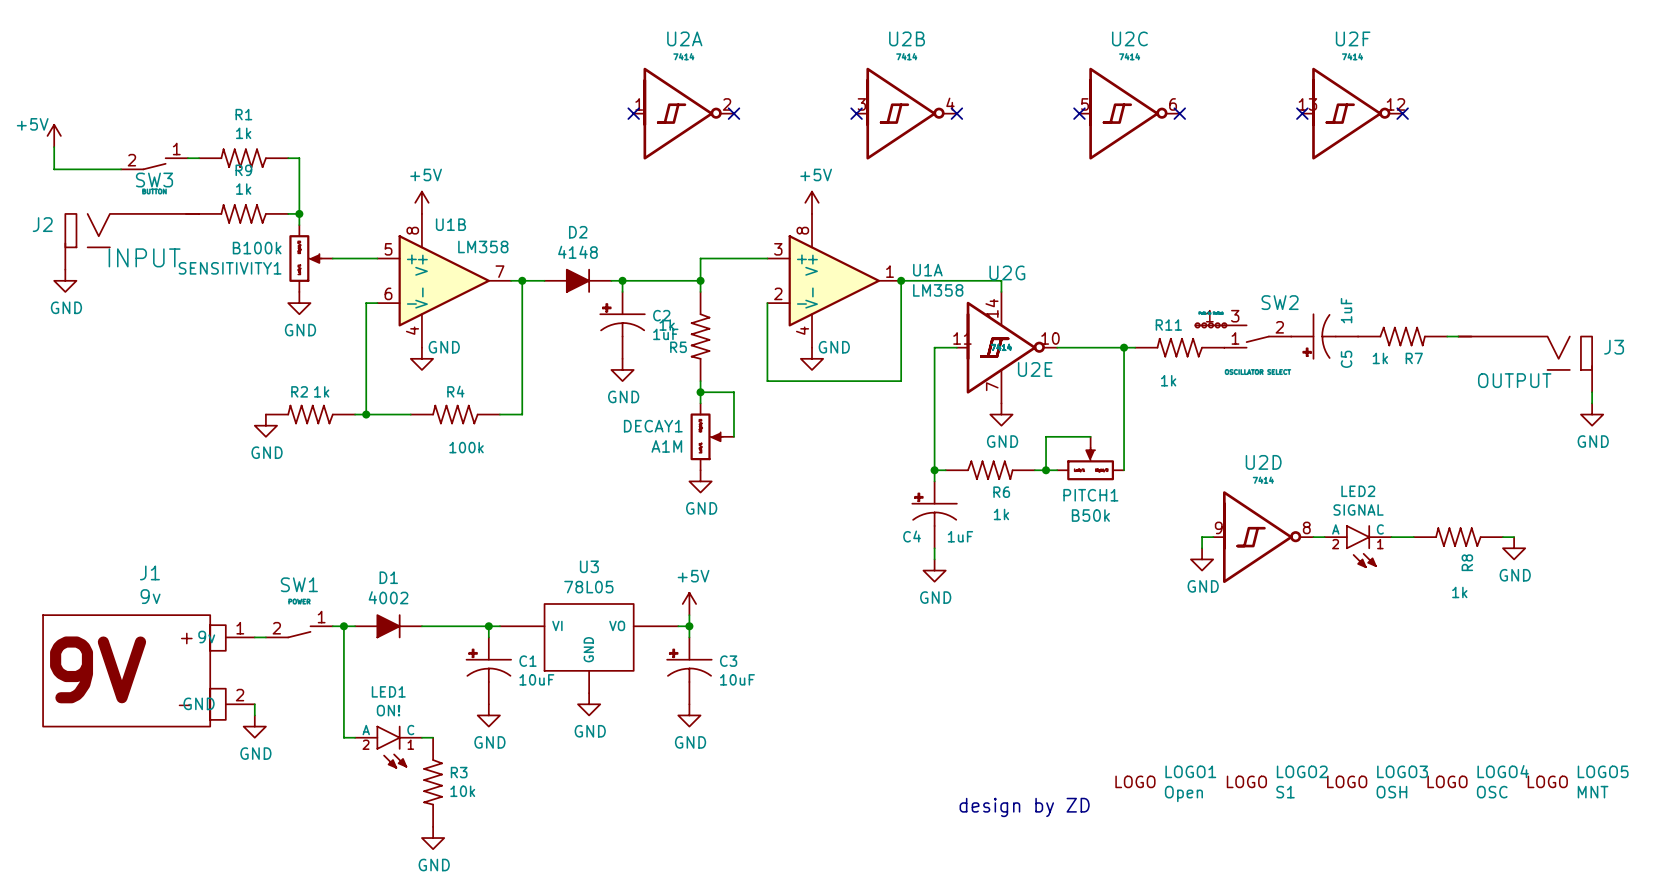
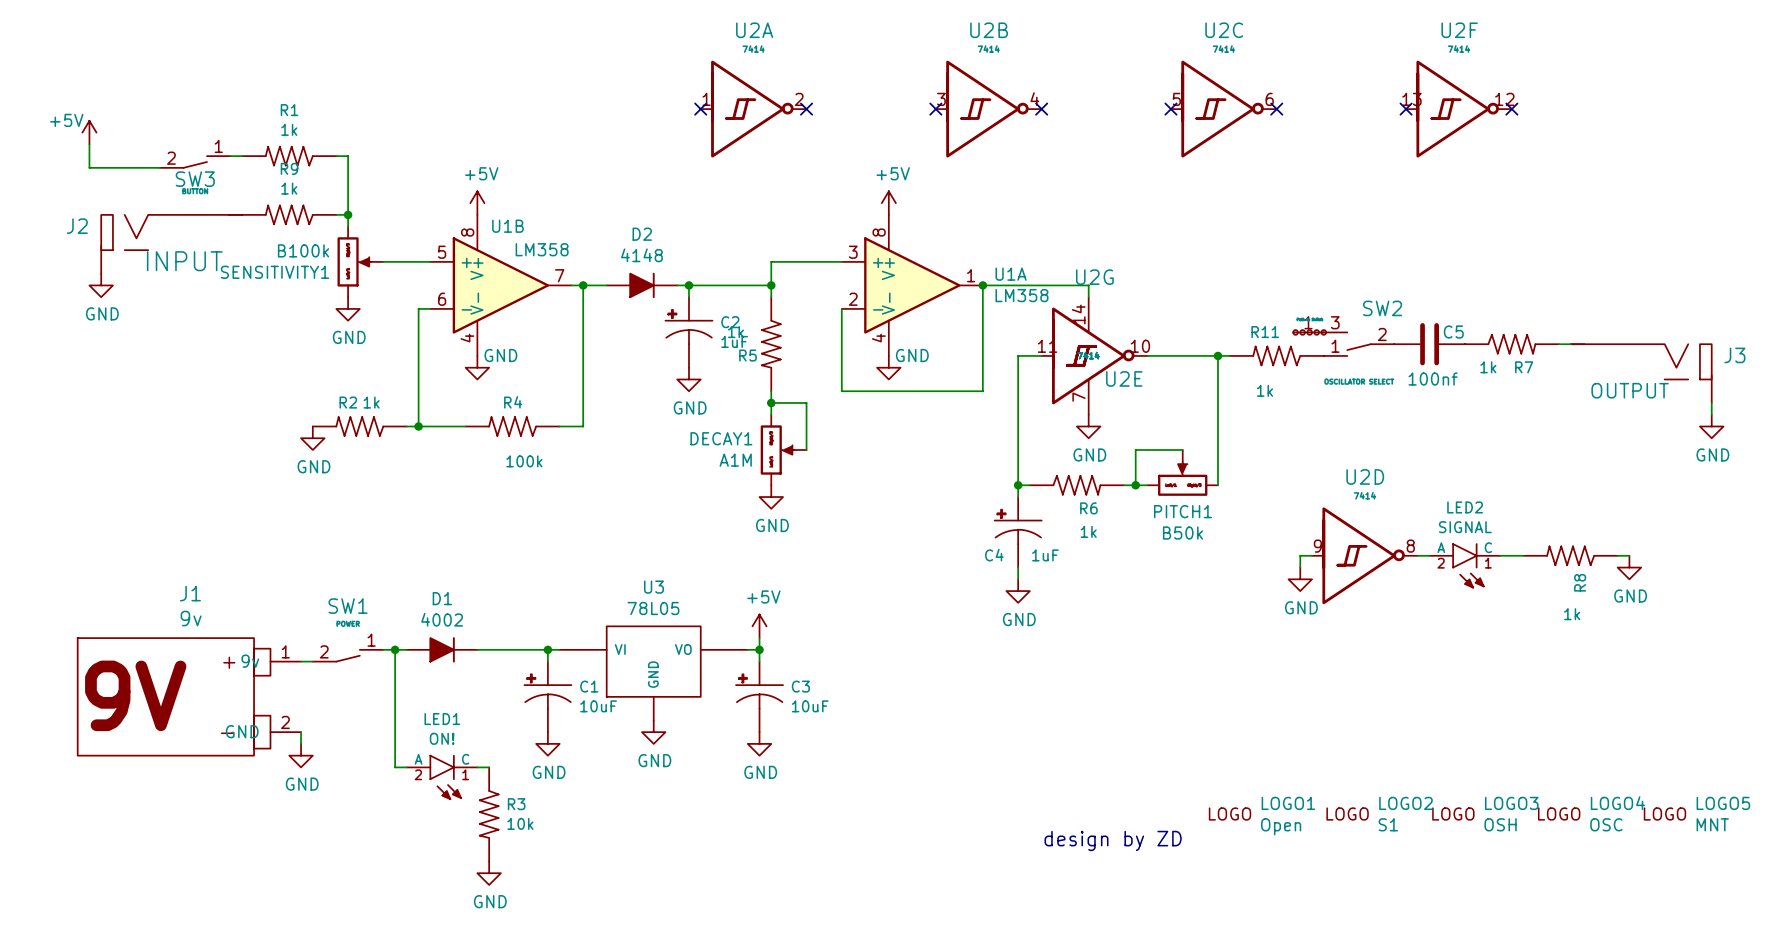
C5 value: 1uF (1346, 310) -> 100nf (1433, 379)
C5 symbol: [1291, 314, 1359, 359] -> [1394, 323, 1465, 366]
C5 name position: C5 (1346, 359) -> C5 (1453, 332)

